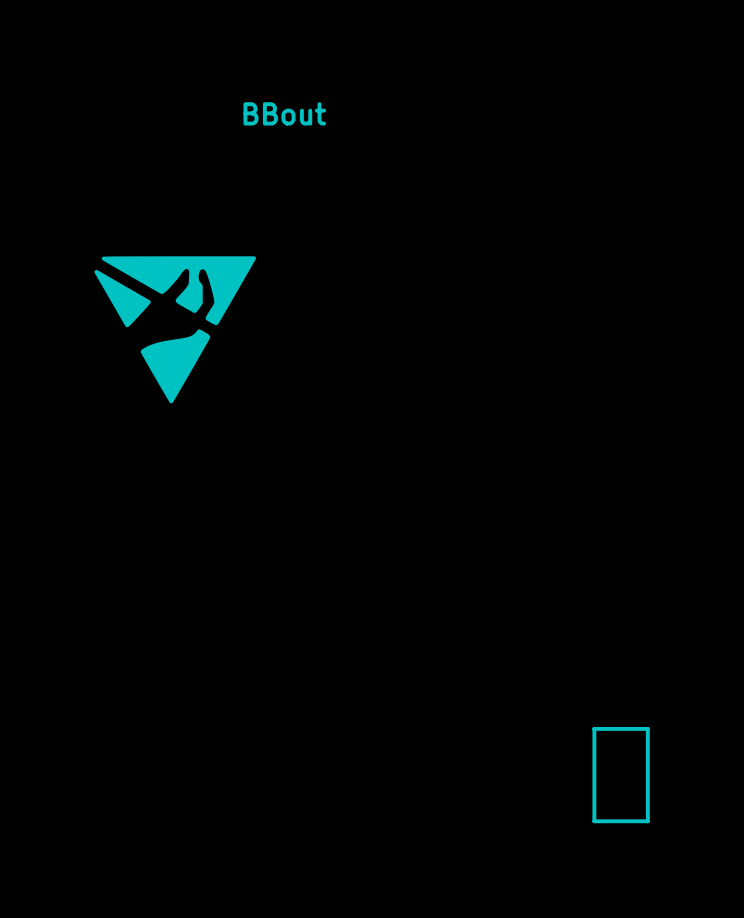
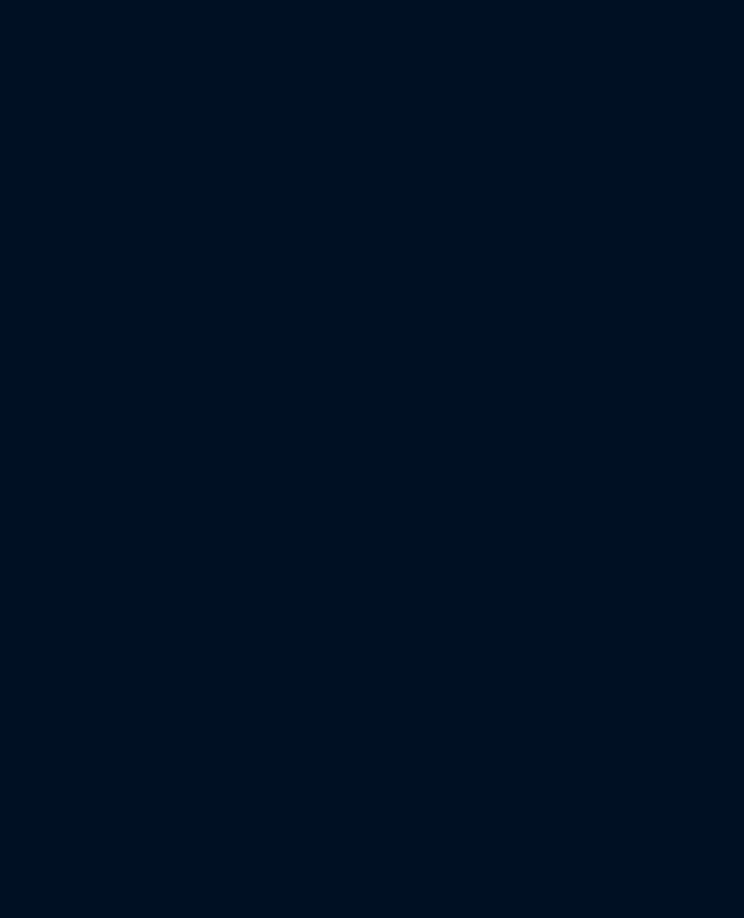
text: BBout (284, 113) -> none
drawing: [94, 256, 257, 404] -> none
line: (594, 728) (647, 728) (647, 821) (594, 821) (594, 728) -> none

